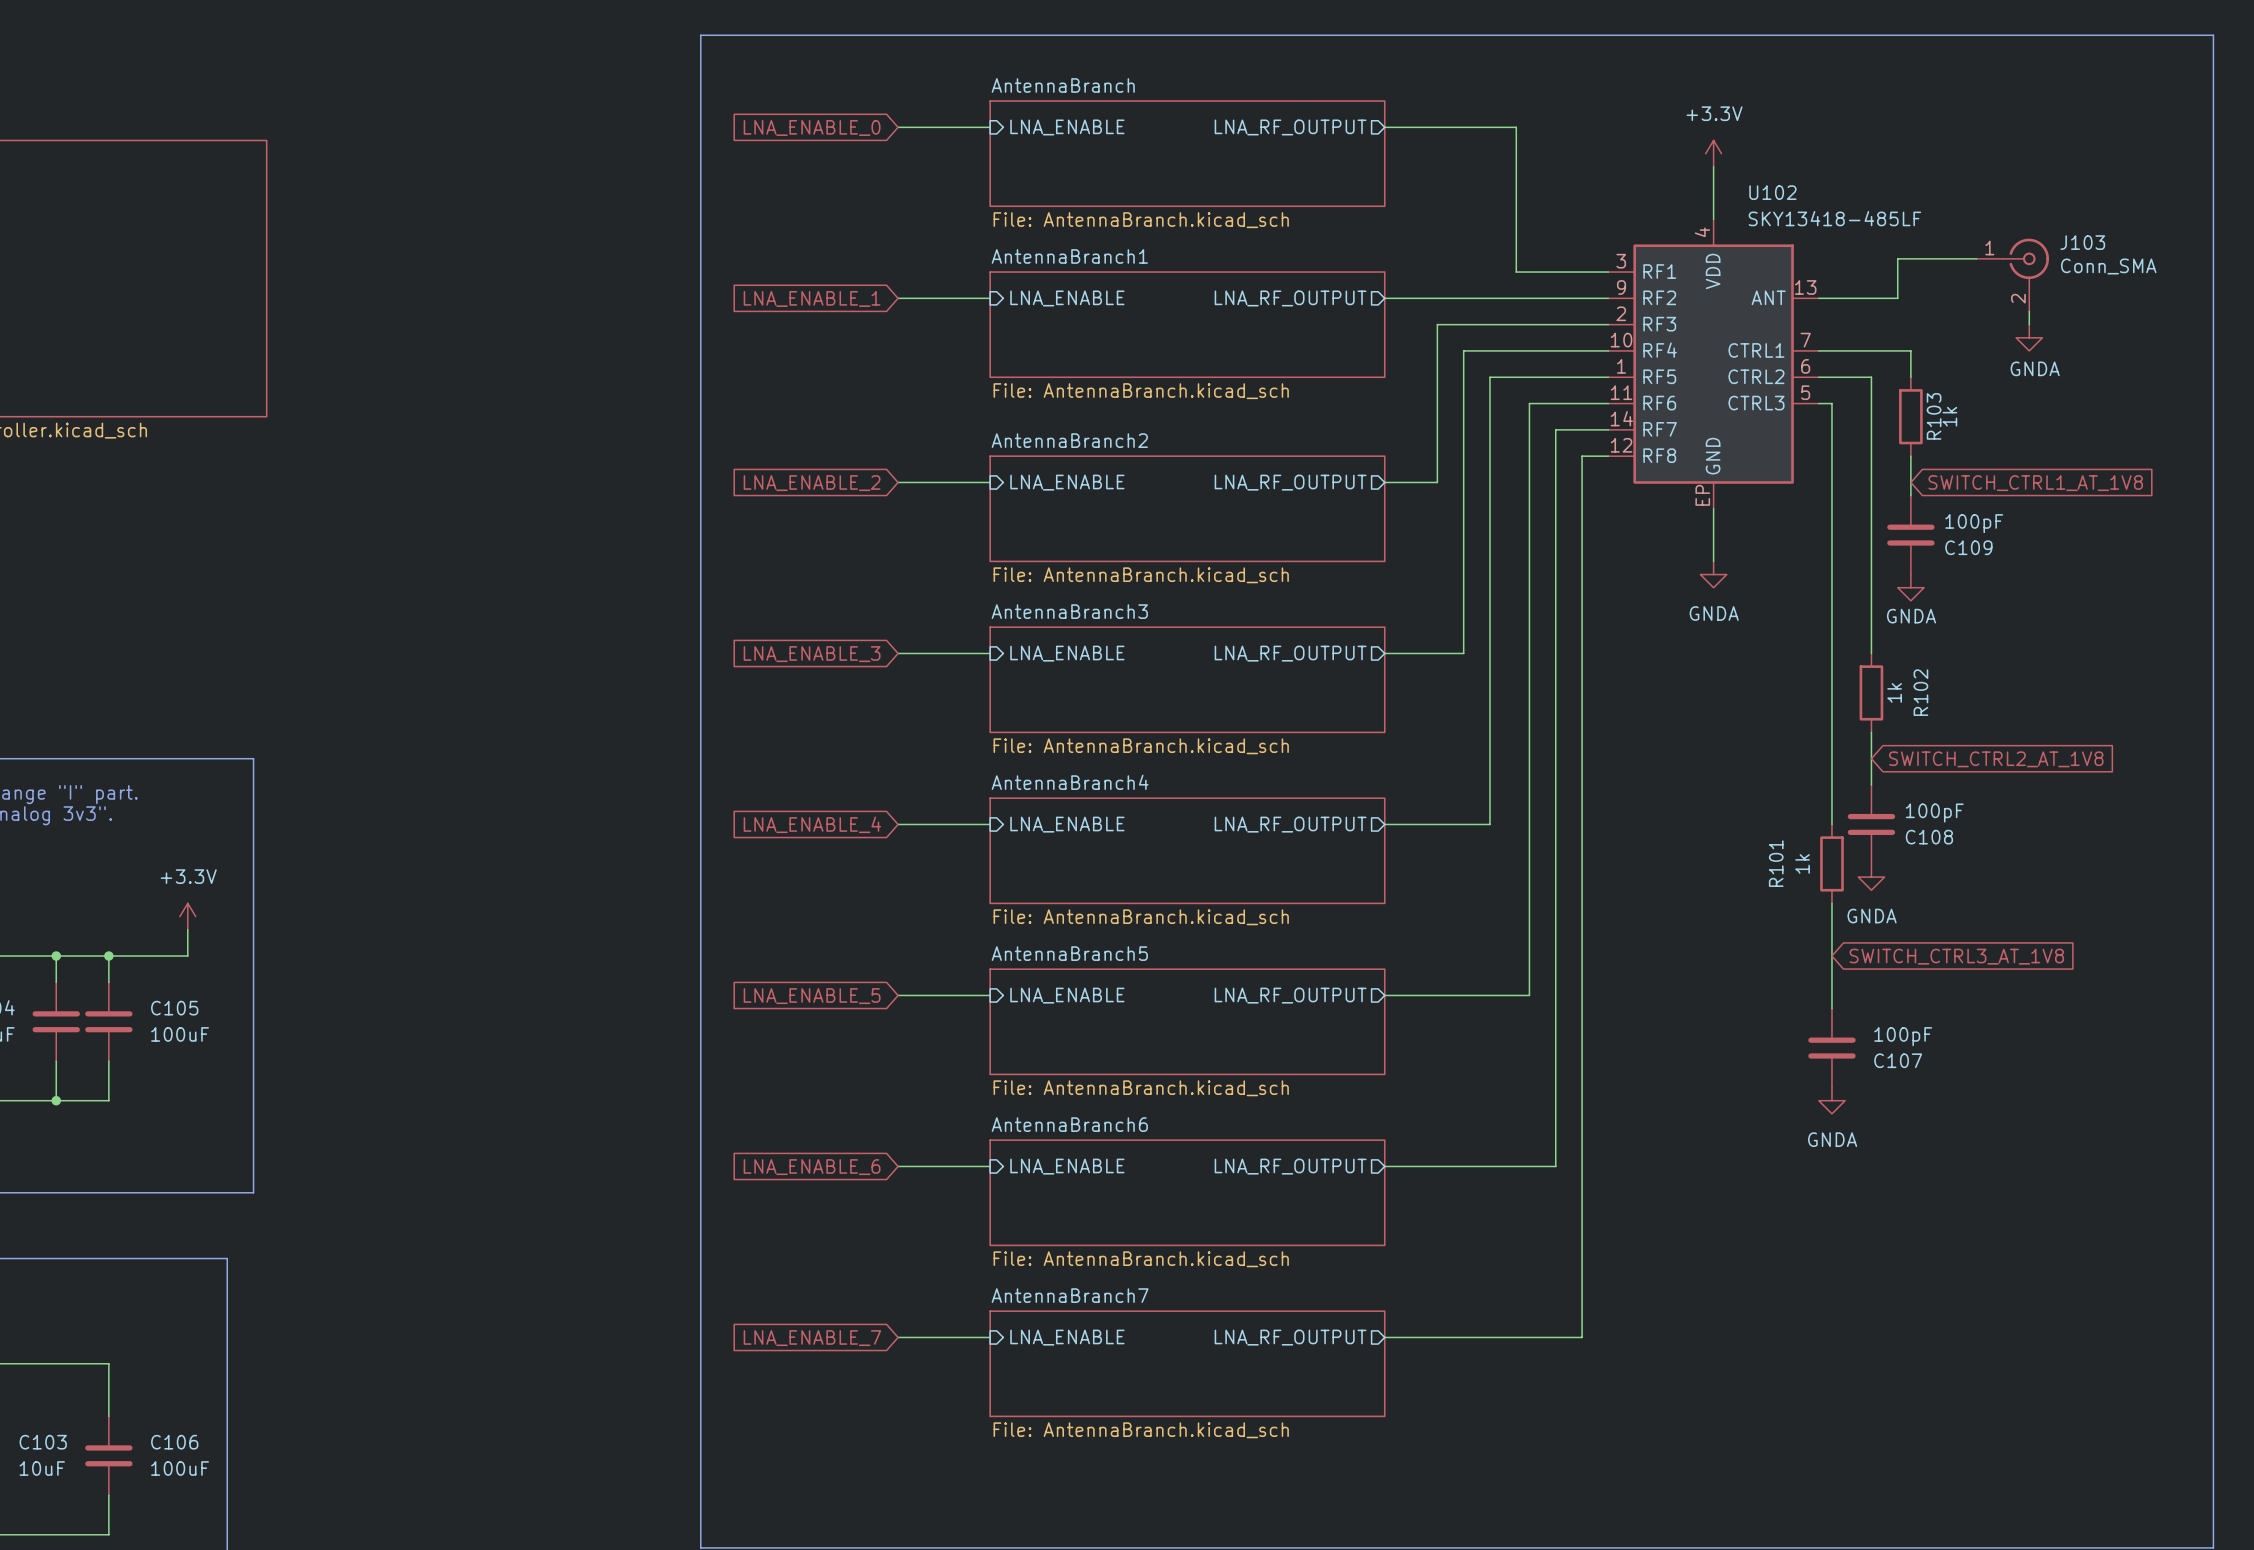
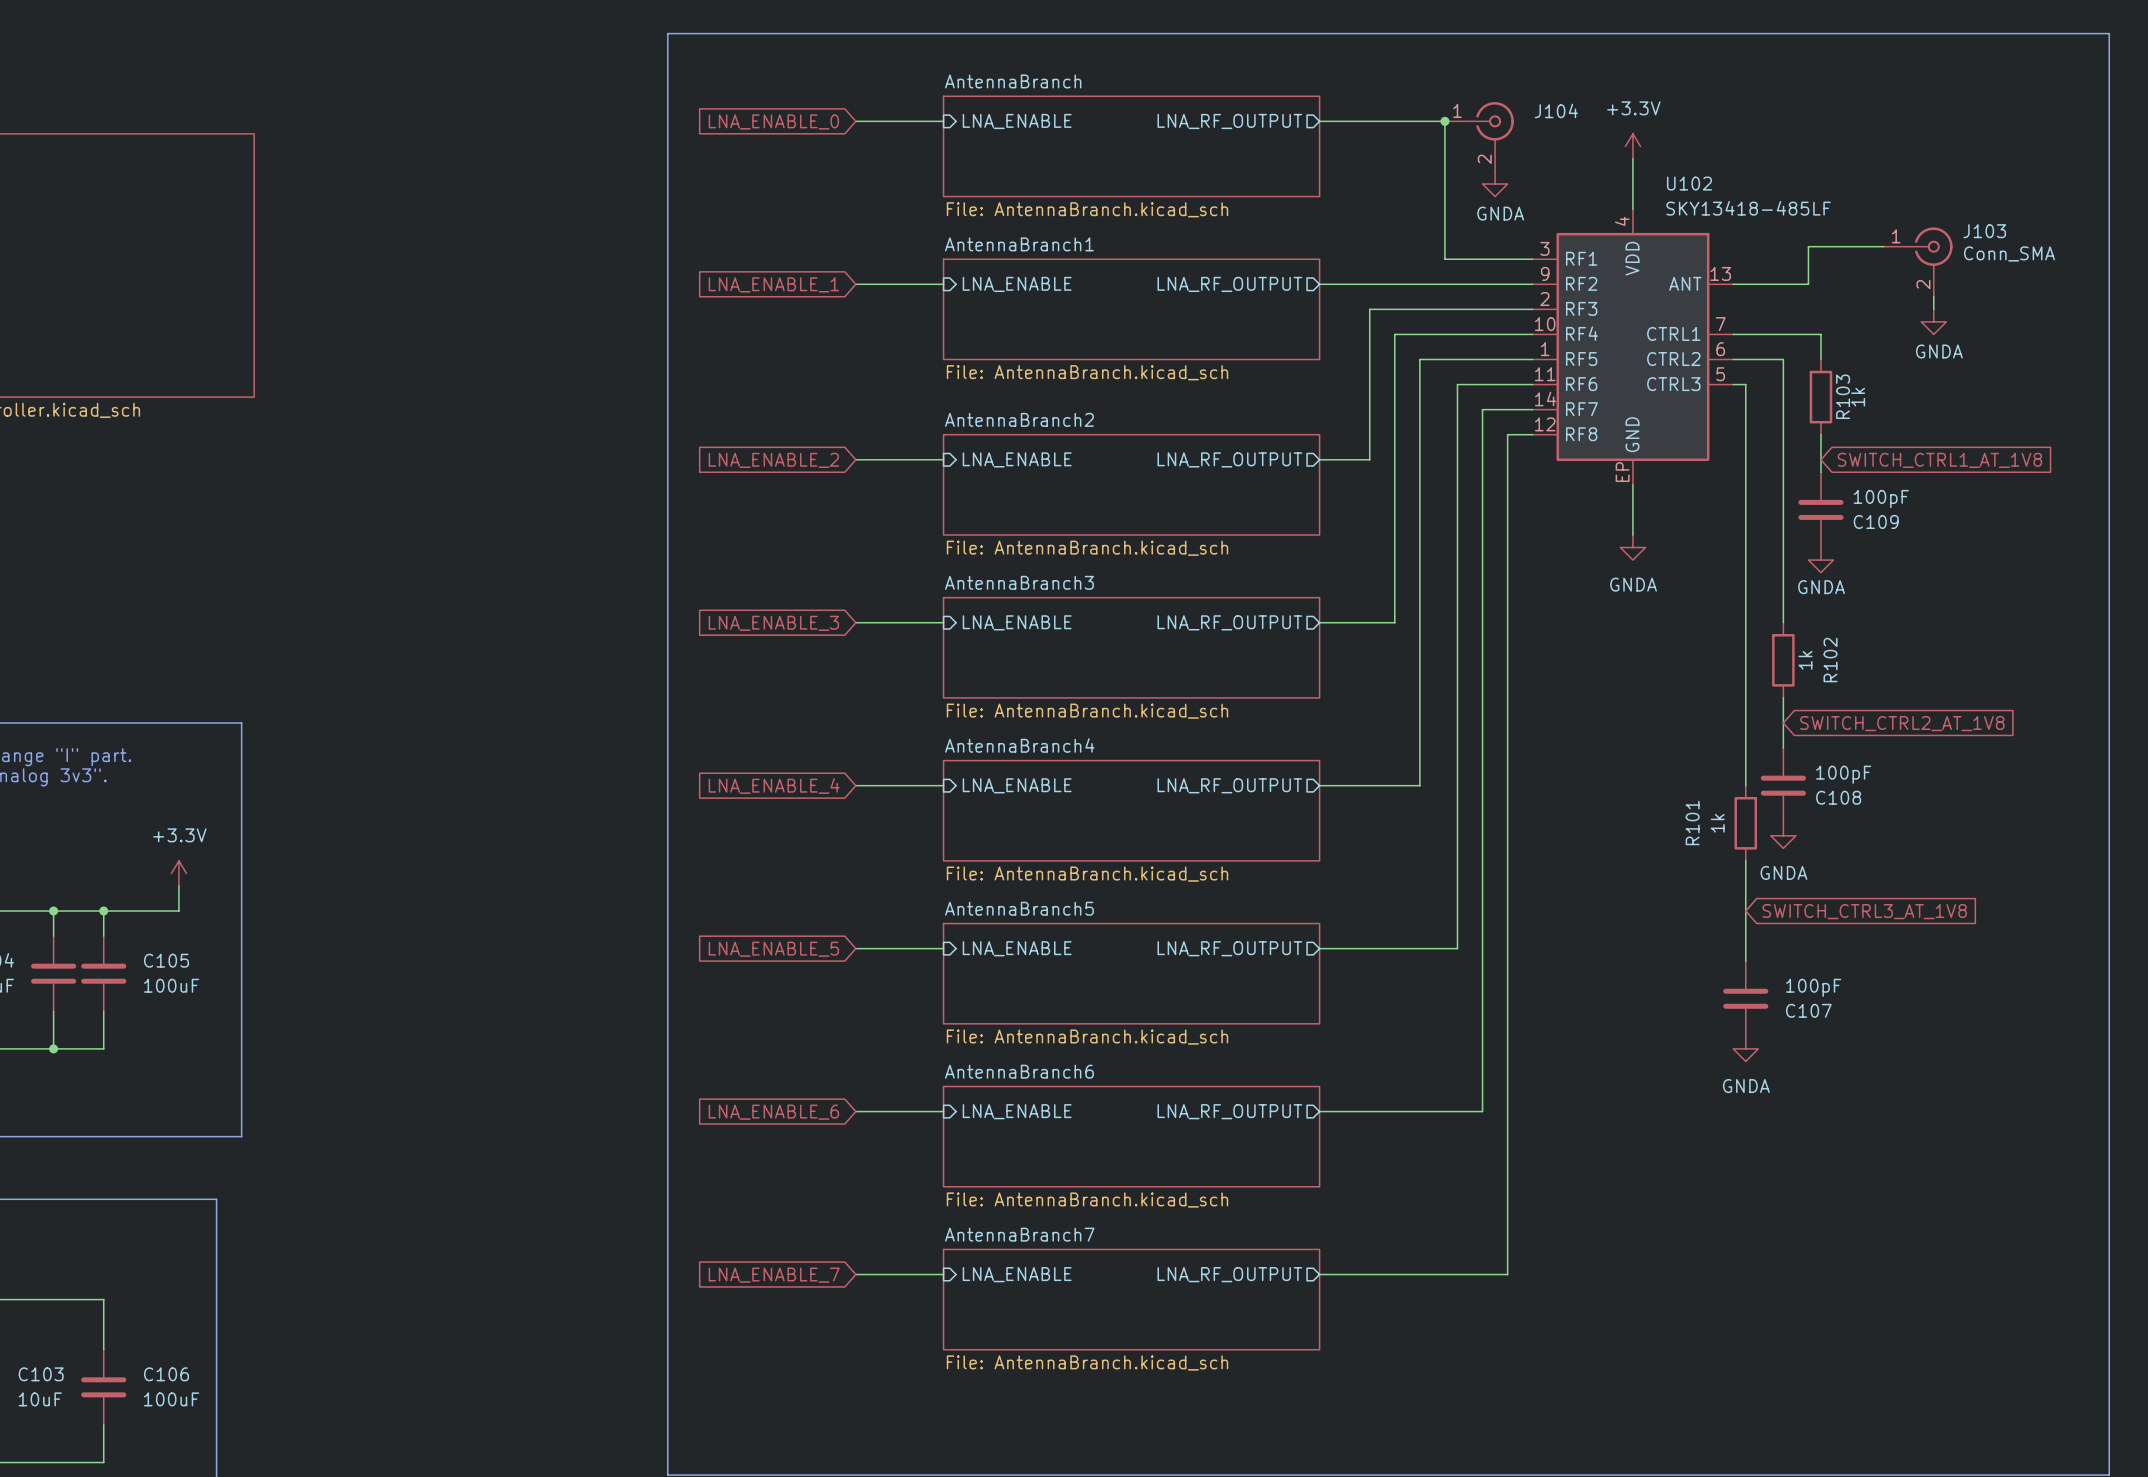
junction: none -> (1444, 121)
J104: none -> (1479, 136)
power symbol: none -> GNDA (1495, 184)

